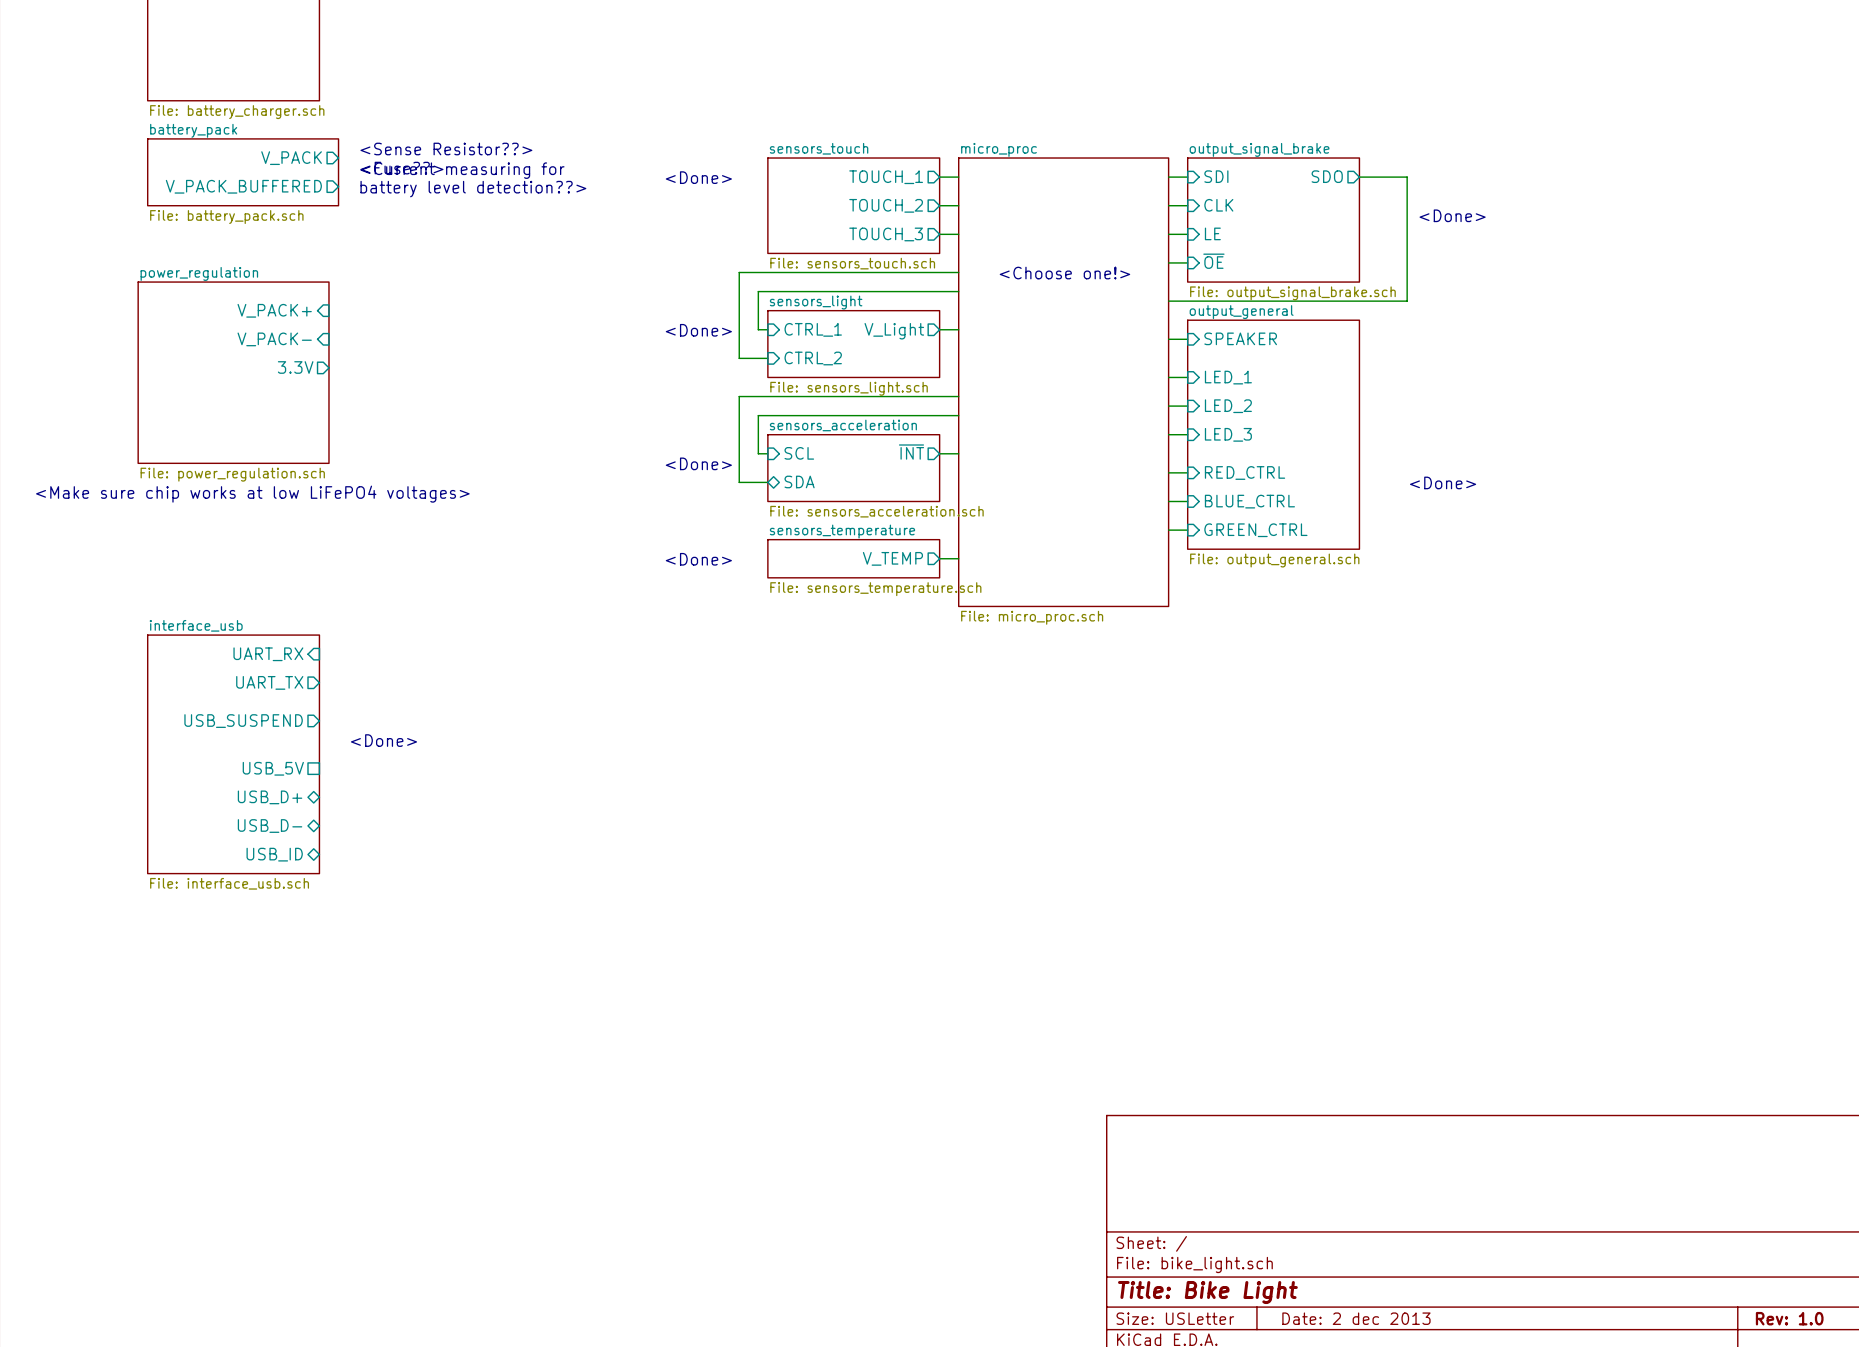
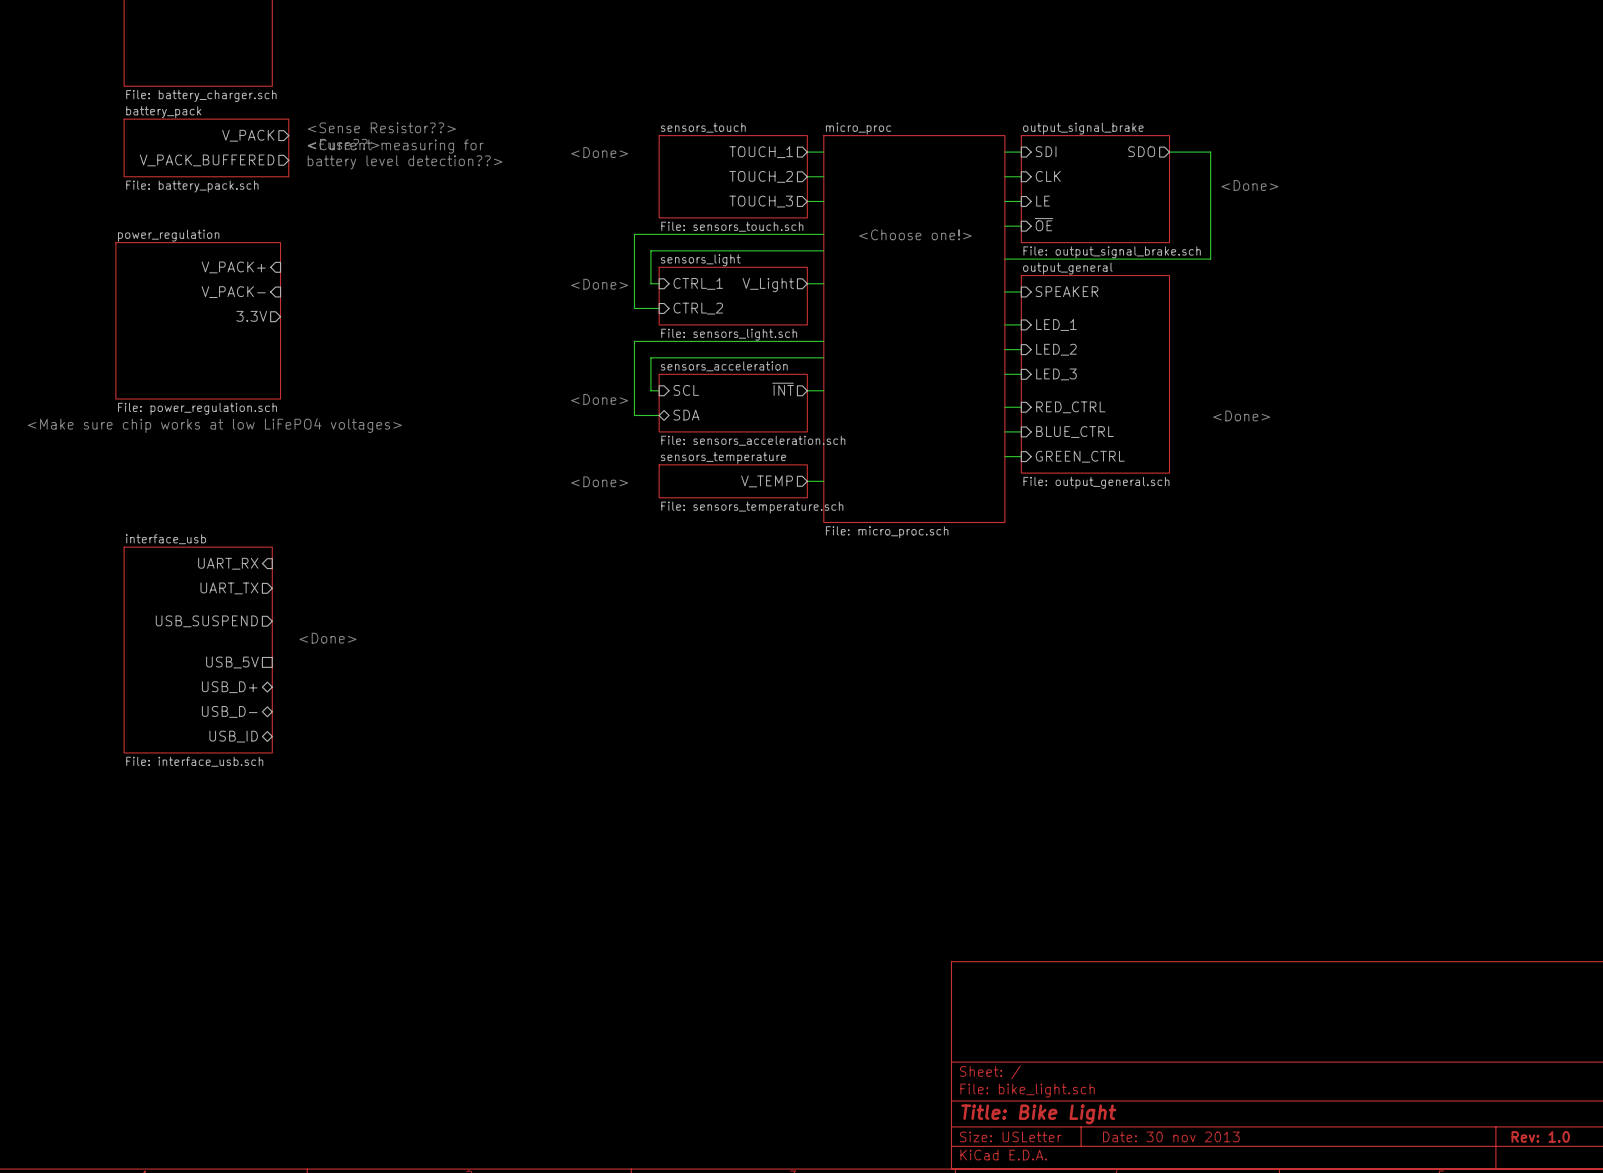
title block: Date: 2 dec 2013 (1356, 1318) -> Date: 30 nov 2013 (1171, 1136)

